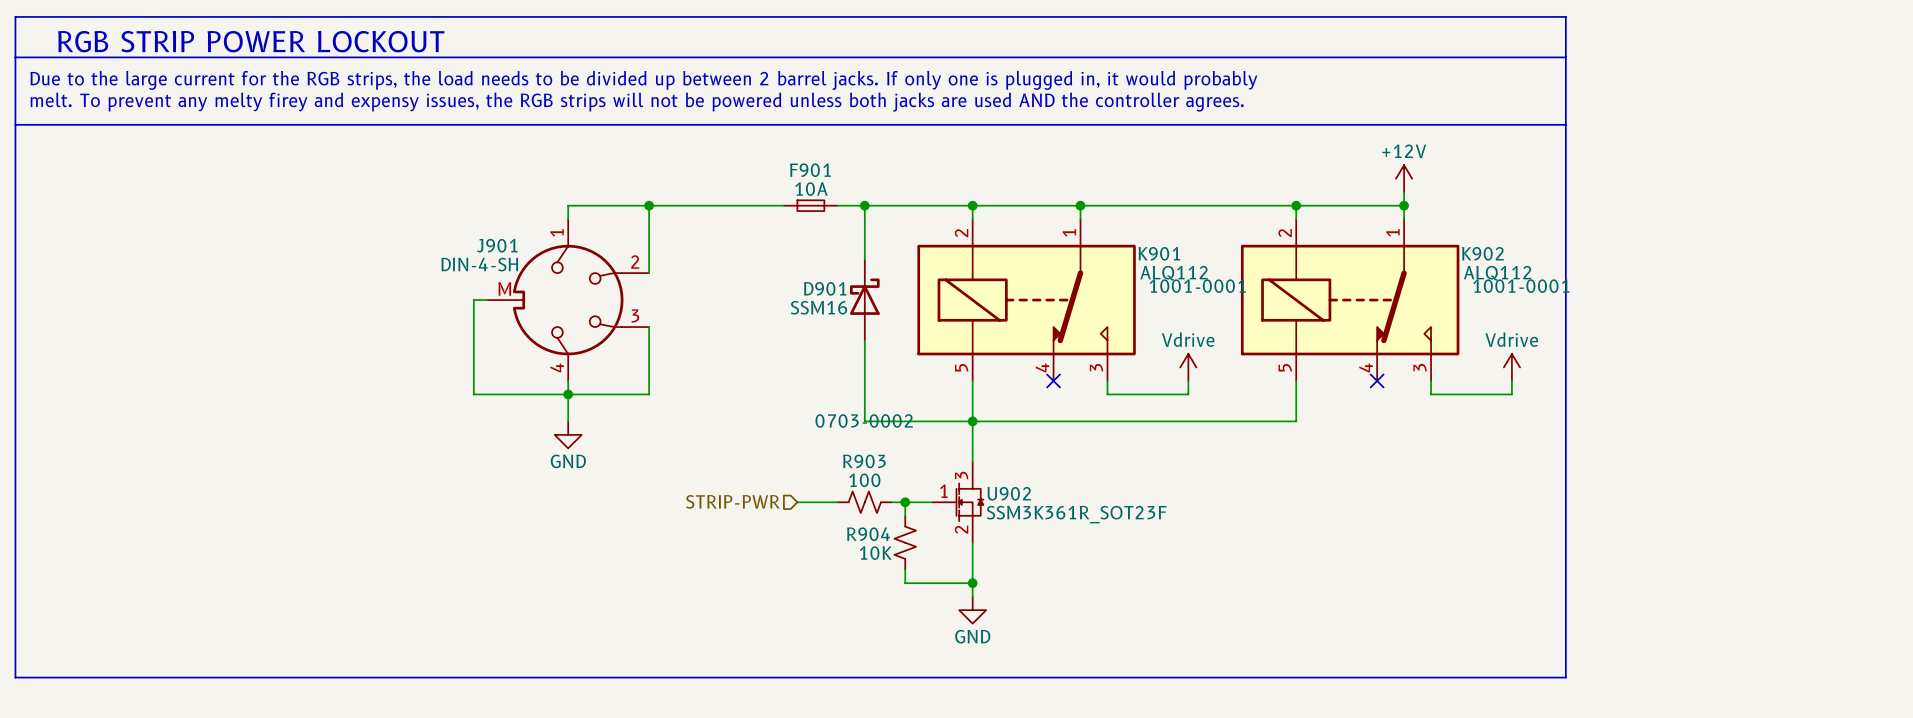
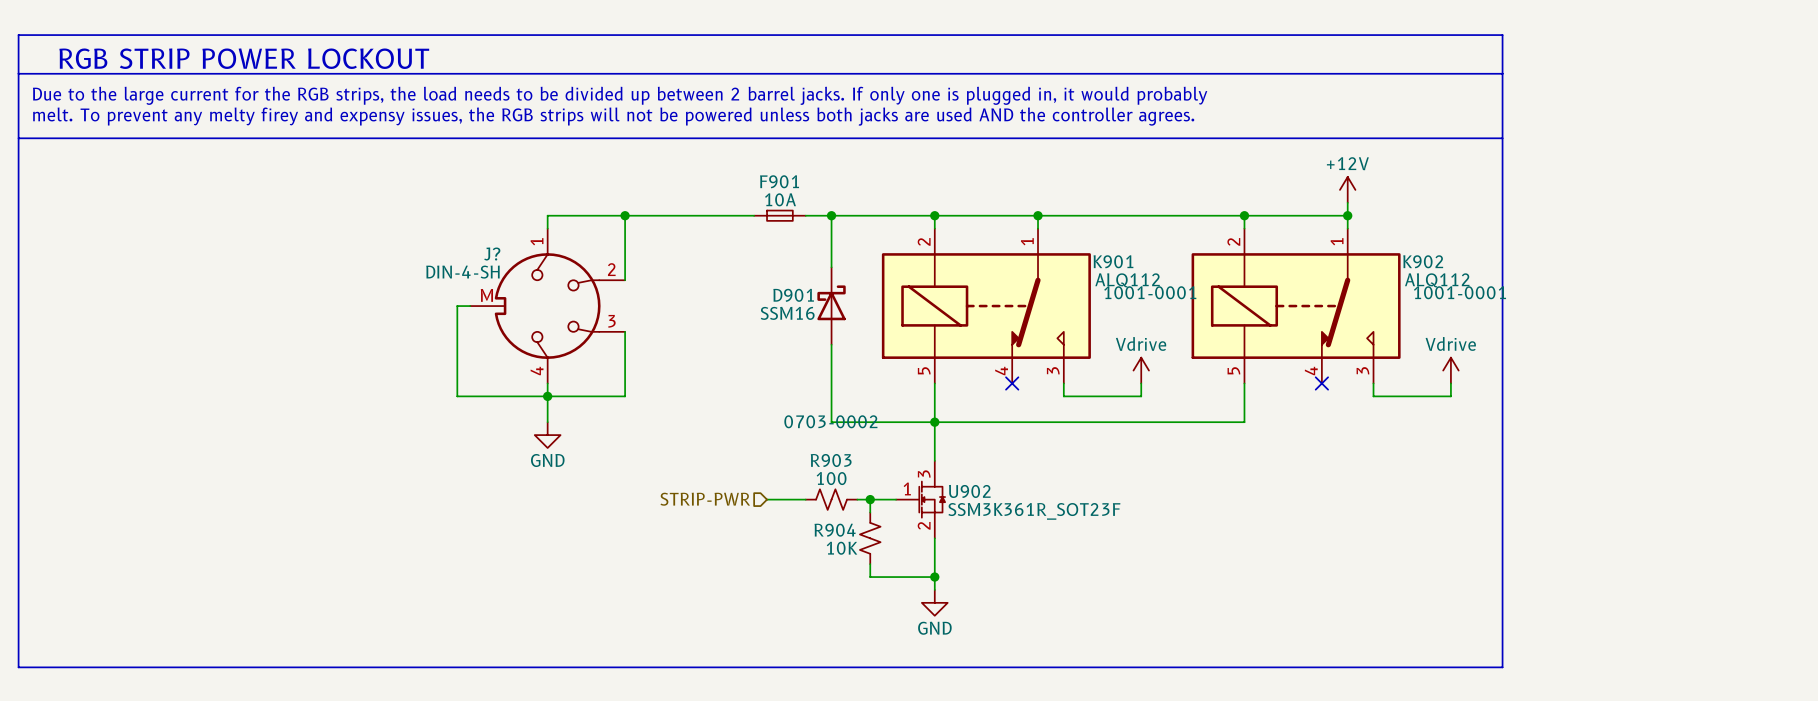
J901 name: J901 (497, 245) -> J? (492, 254)

